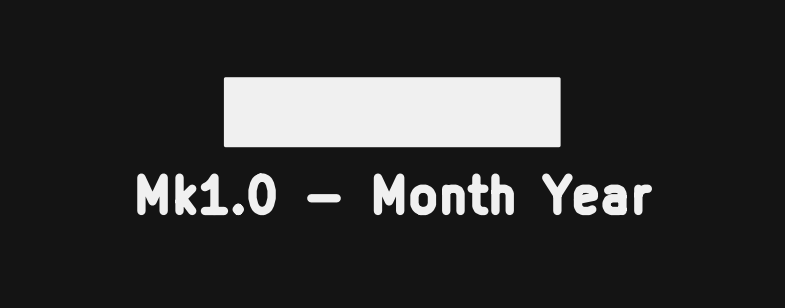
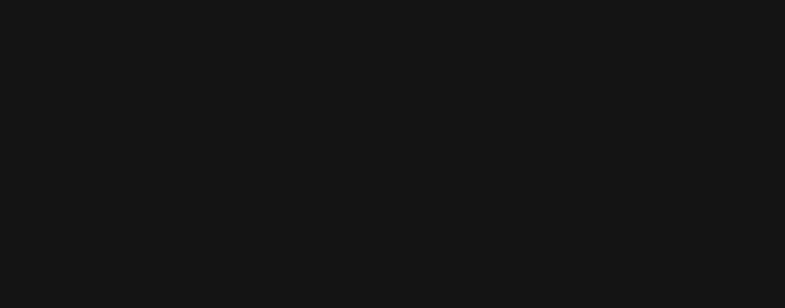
drawing: [223, 77, 561, 148] -> none
text: Mk1.0 - Month Year (394, 194) -> none

